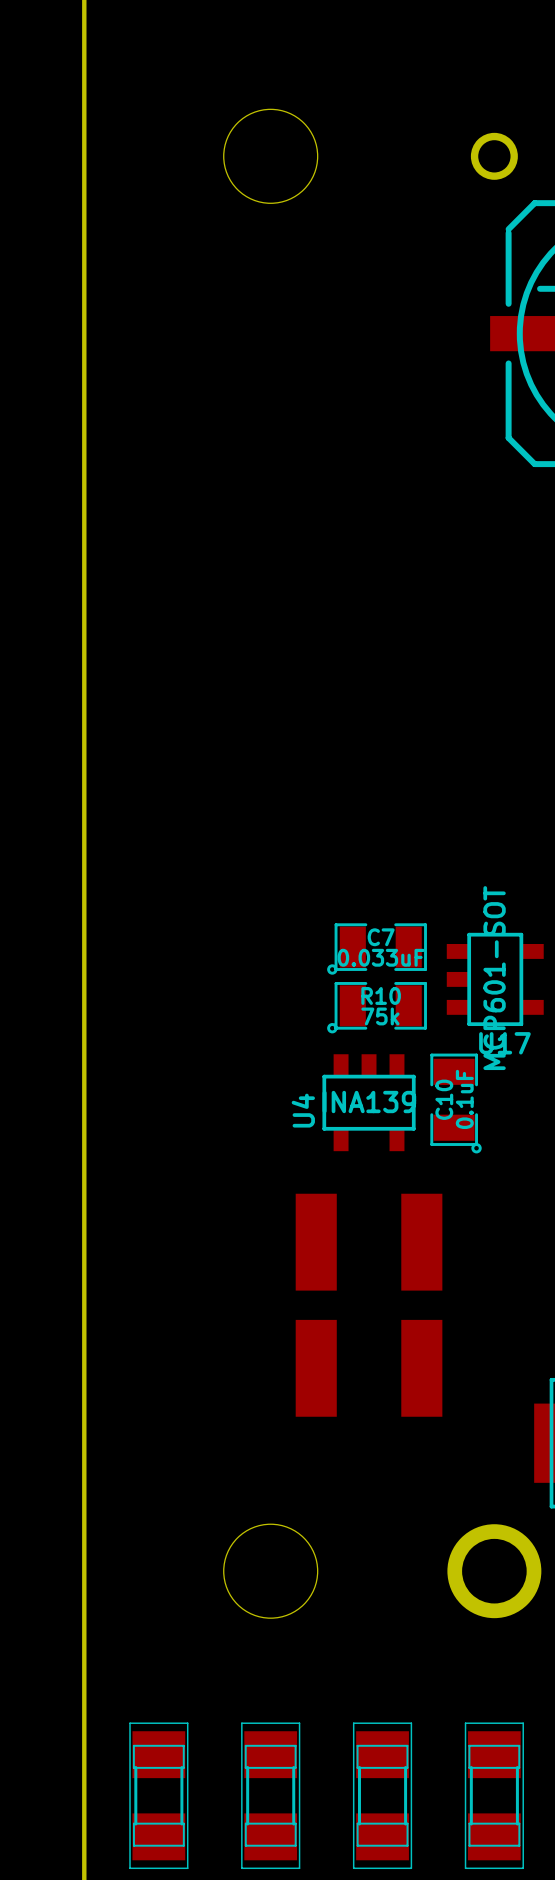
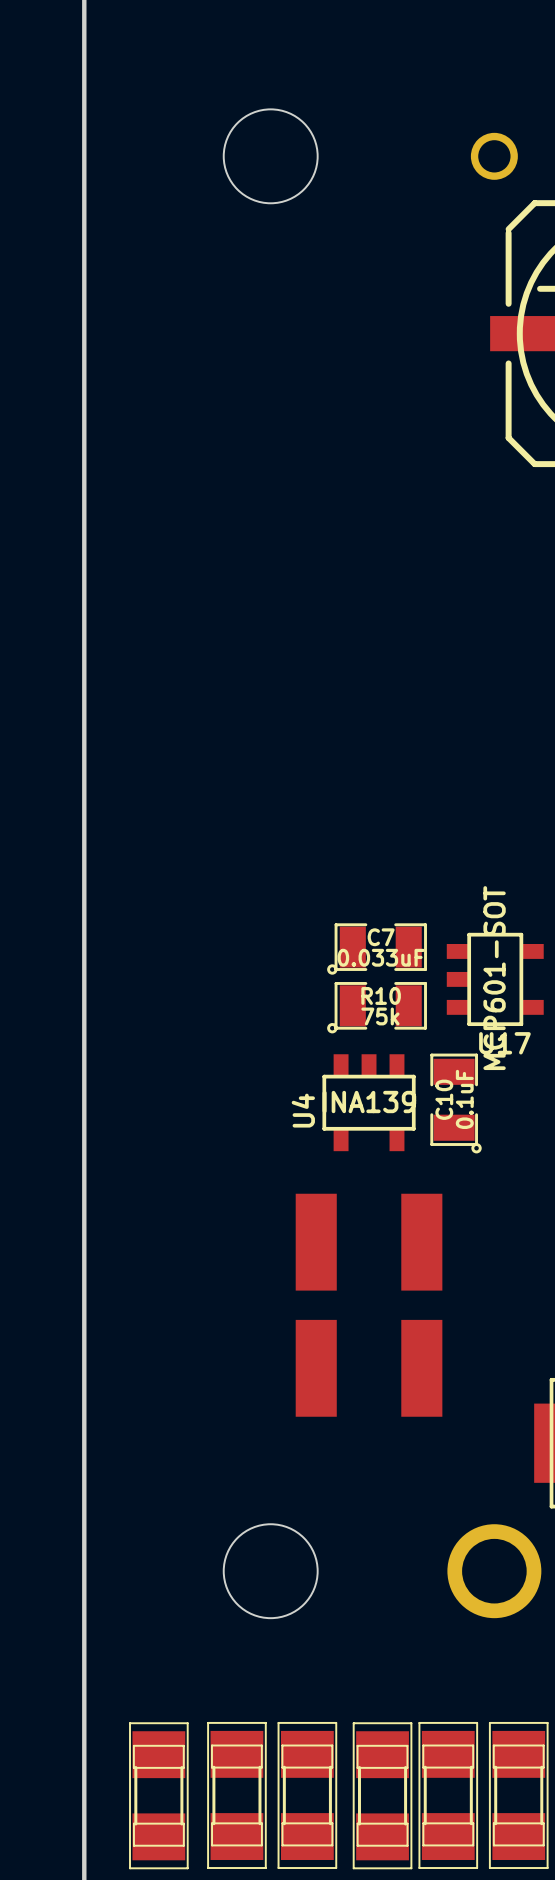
part: none -> (236, 1795)
part: (270, 1795) -> none
part: none -> (307, 1795)
part: none -> (448, 1795)
part: (494, 1795) -> none
part: none -> (518, 1795)

